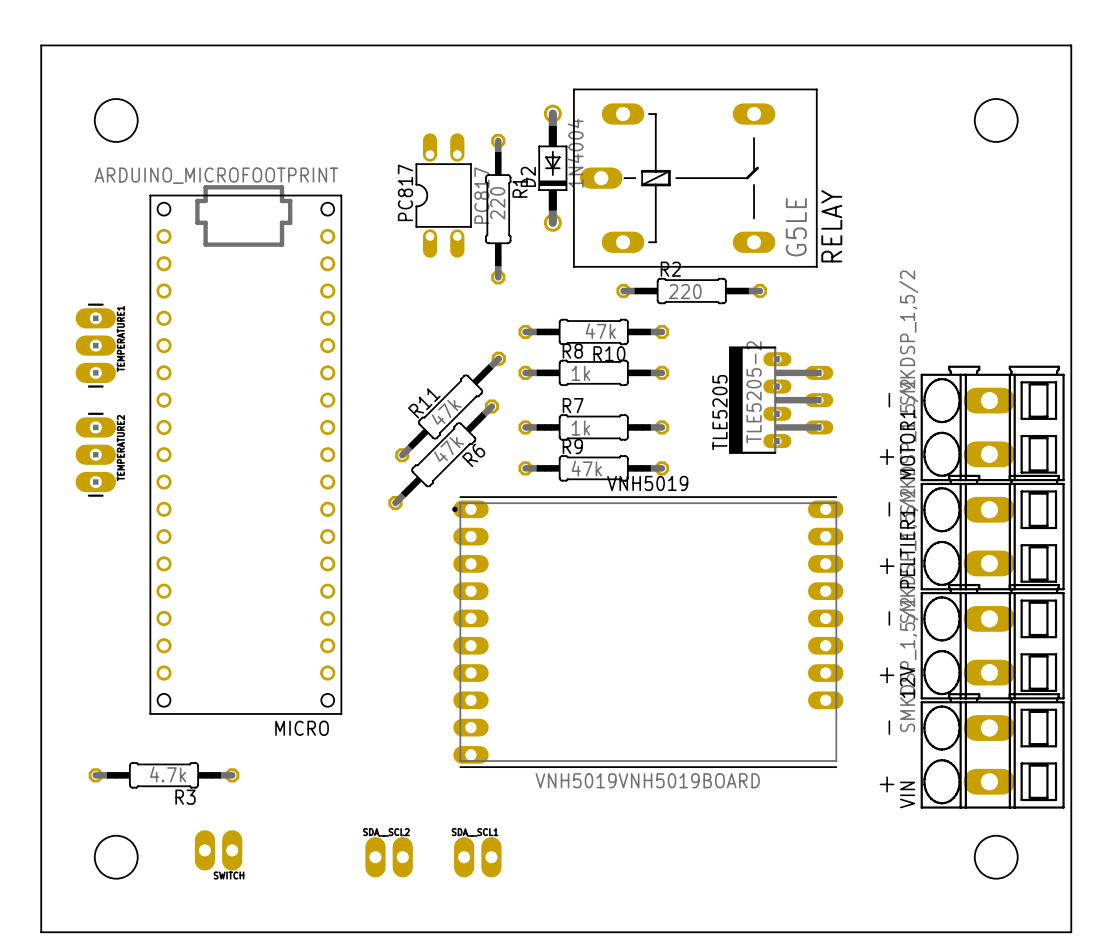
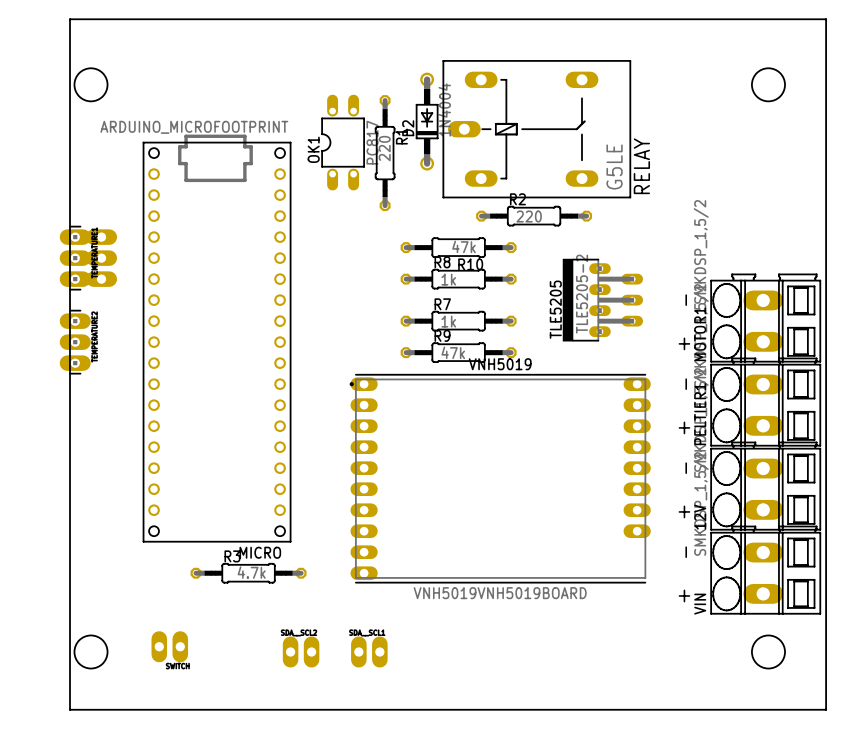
PC817 name: PC817 (405, 192) -> OK1 (313, 149)
part: none -> (101, 258)
R11: 47k (450, 406) -> none
MICRO position: (245, 449) -> (217, 338)
R6: 47k (443, 454) -> none
R3 position: (164, 775) -> (248, 573)
R3 name position: R3 (185, 797) -> R3 (232, 556)
board edge: (88, 932) (41, 932) (41, 45) (1071, 45) (1071, 932) -> (70, 709) (70, 19) (826, 19) (826, 709)

